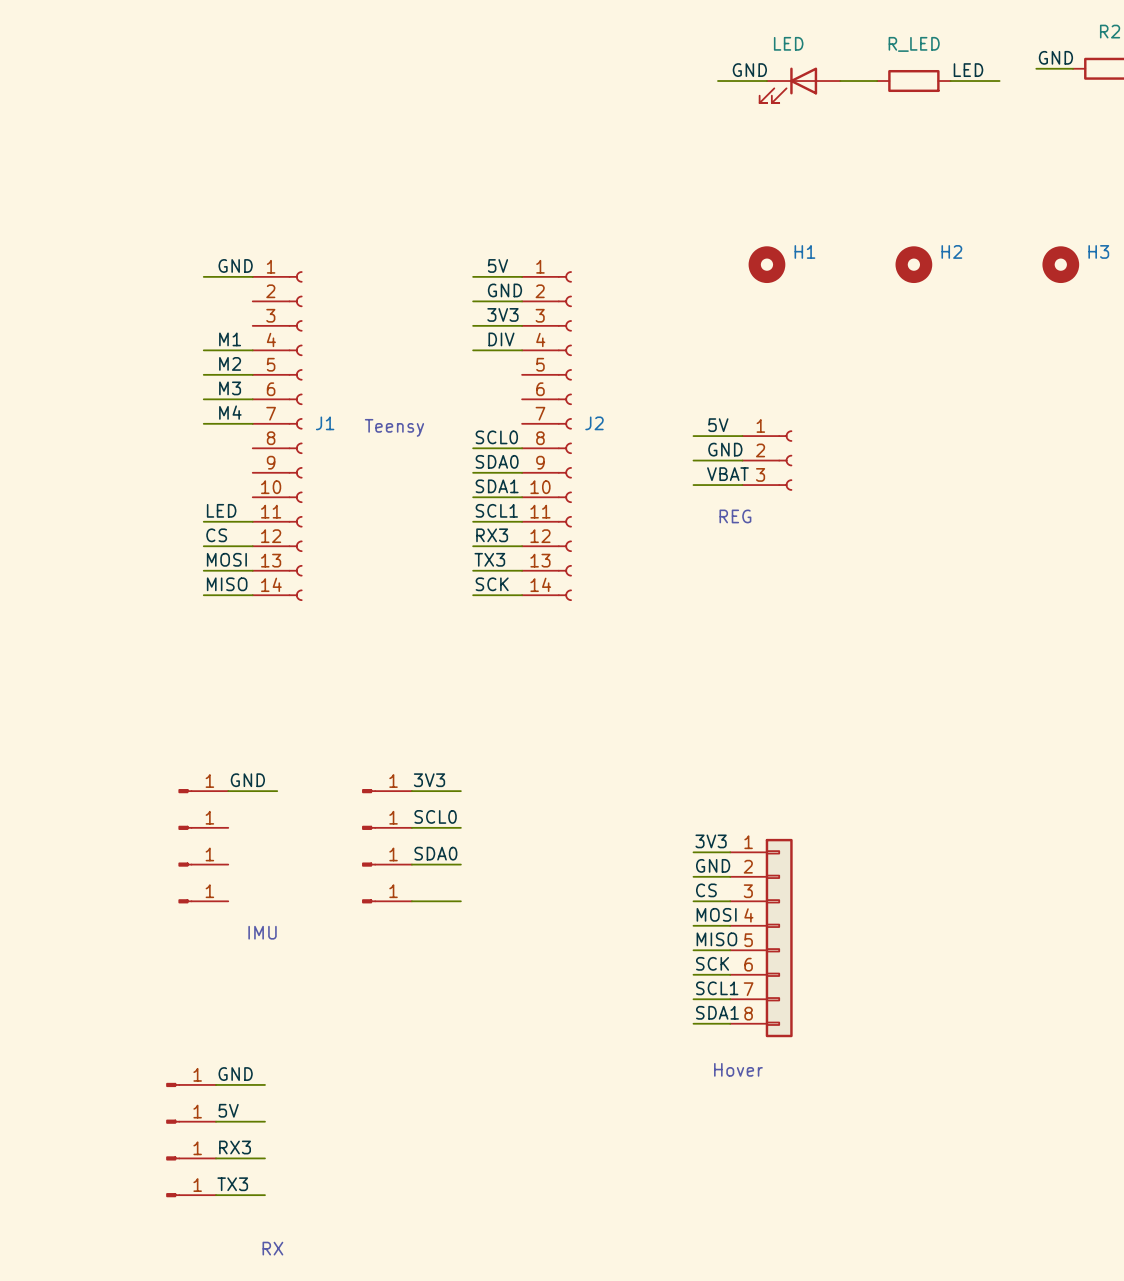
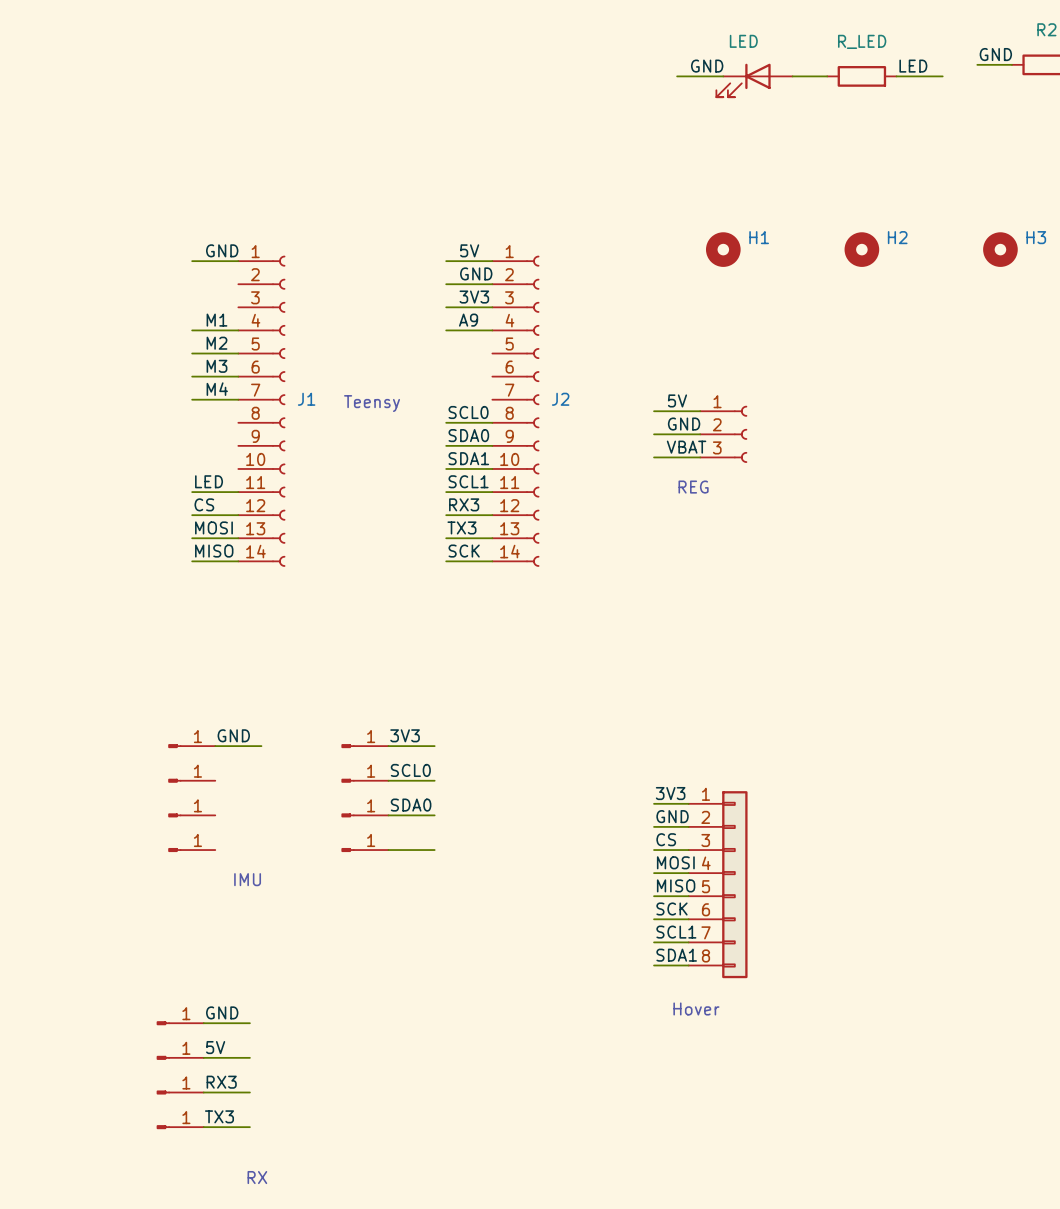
label: DIV (501, 339) -> A9 (468, 320)

